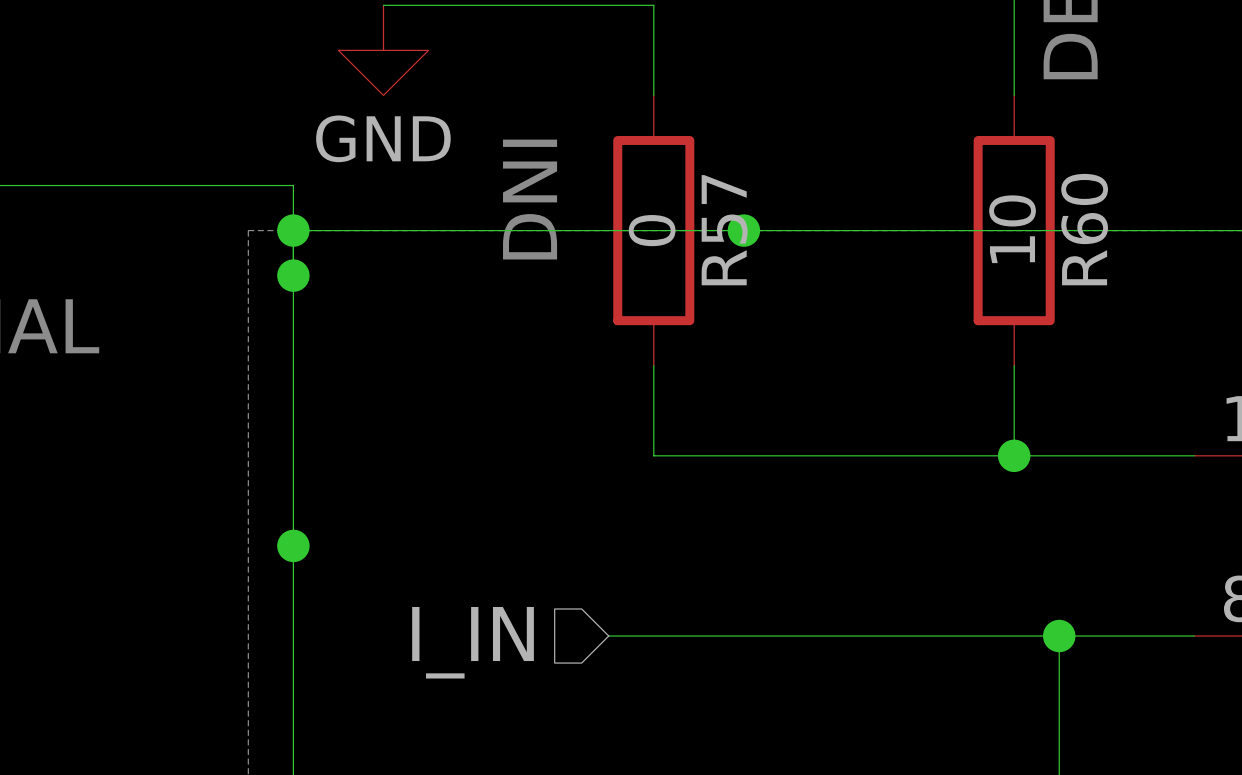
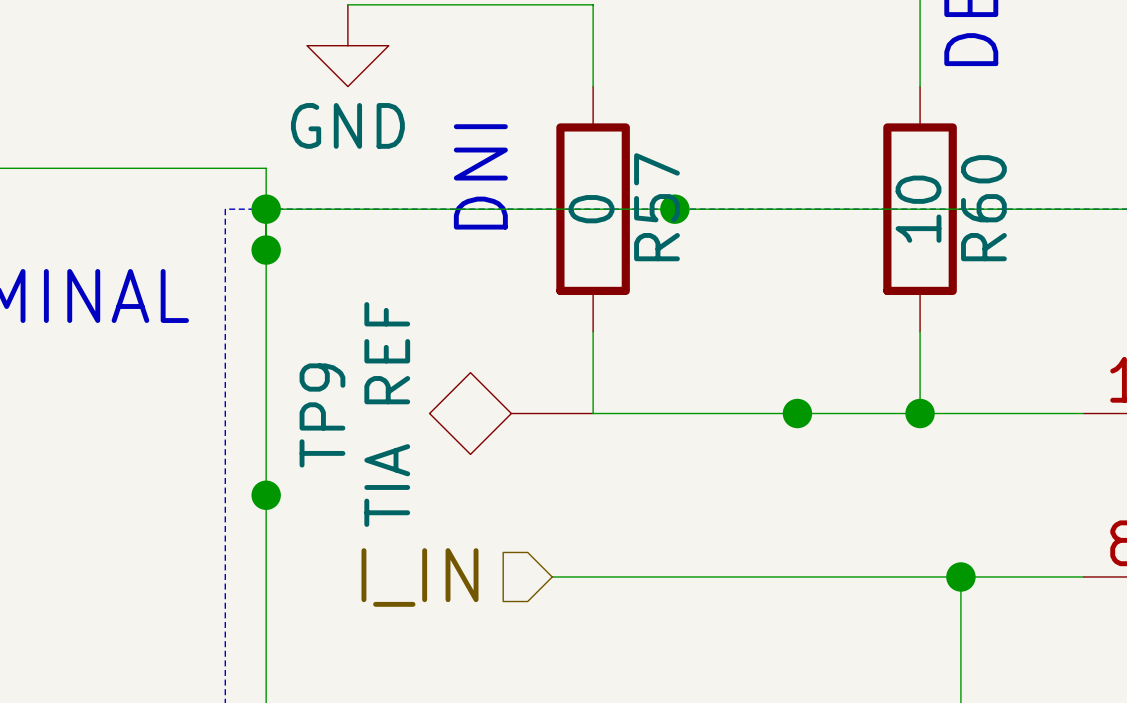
TP9: none -> TIA REF (511, 413)
junction: none -> (797, 413)

